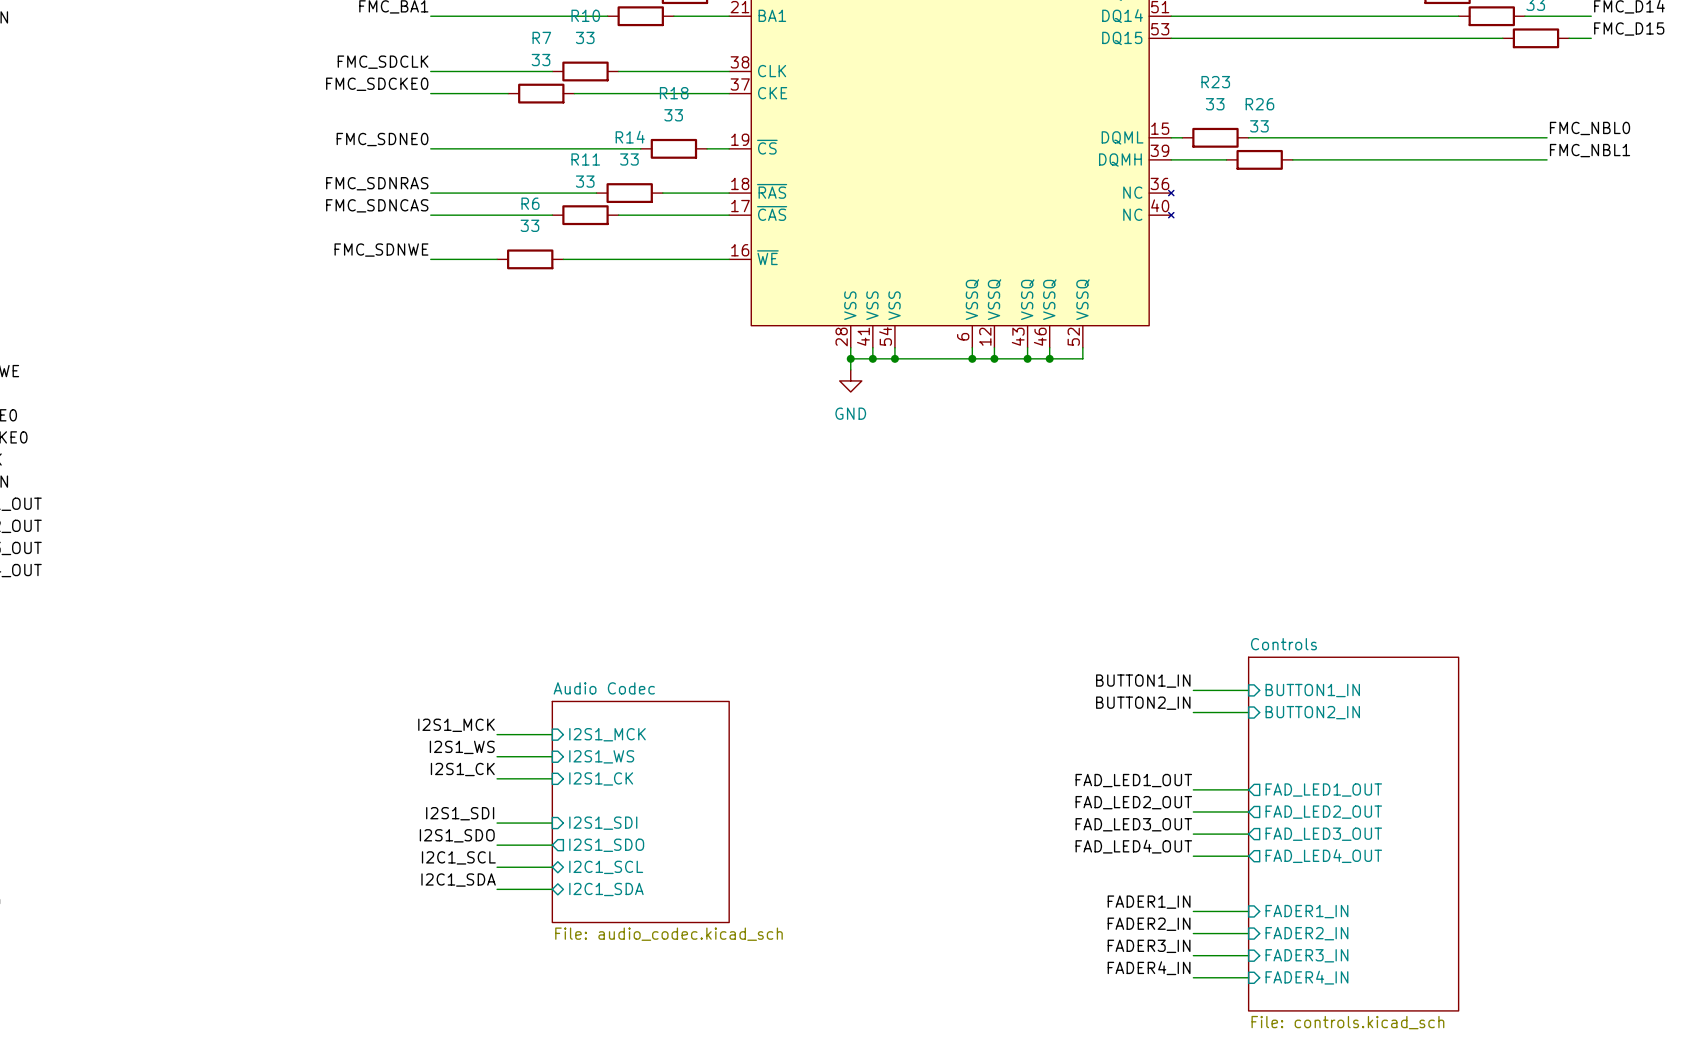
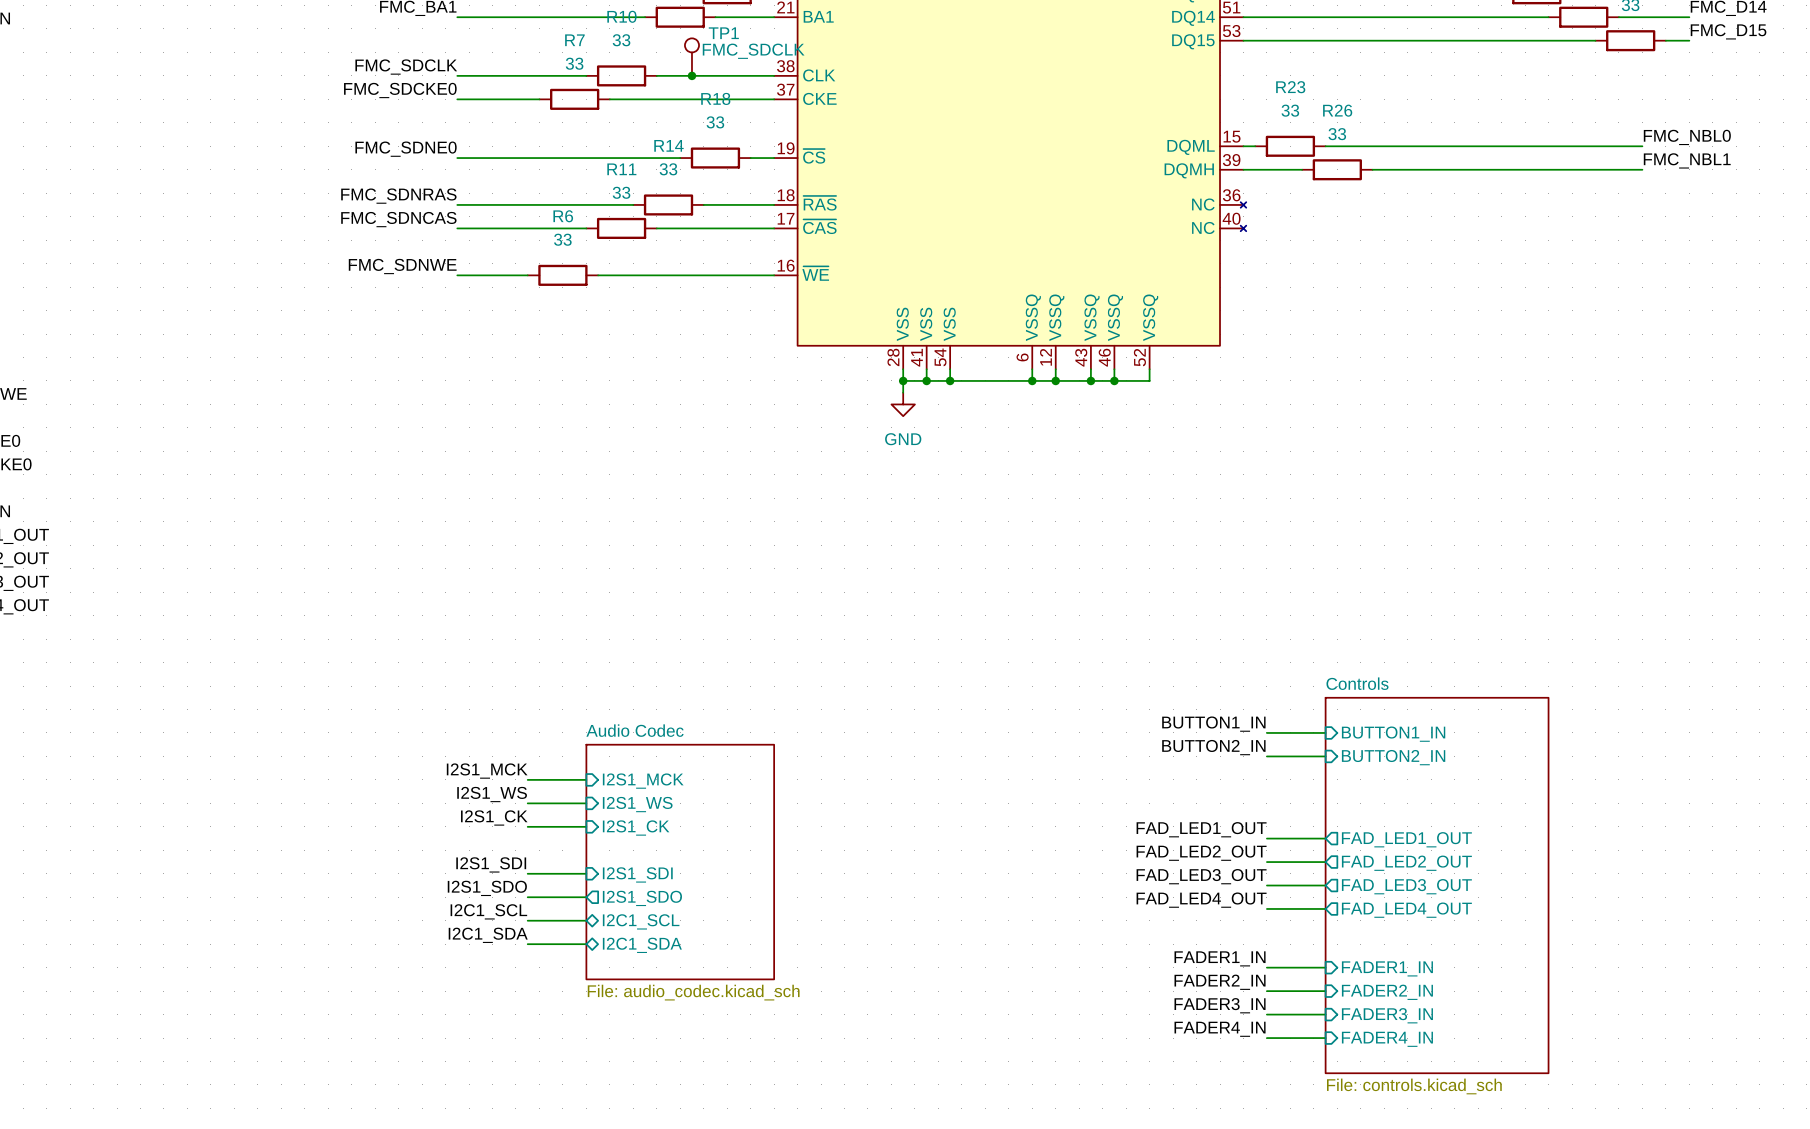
TP1: none -> FMC_SDCLK (691, 57)
junction: none -> (691, 75)

